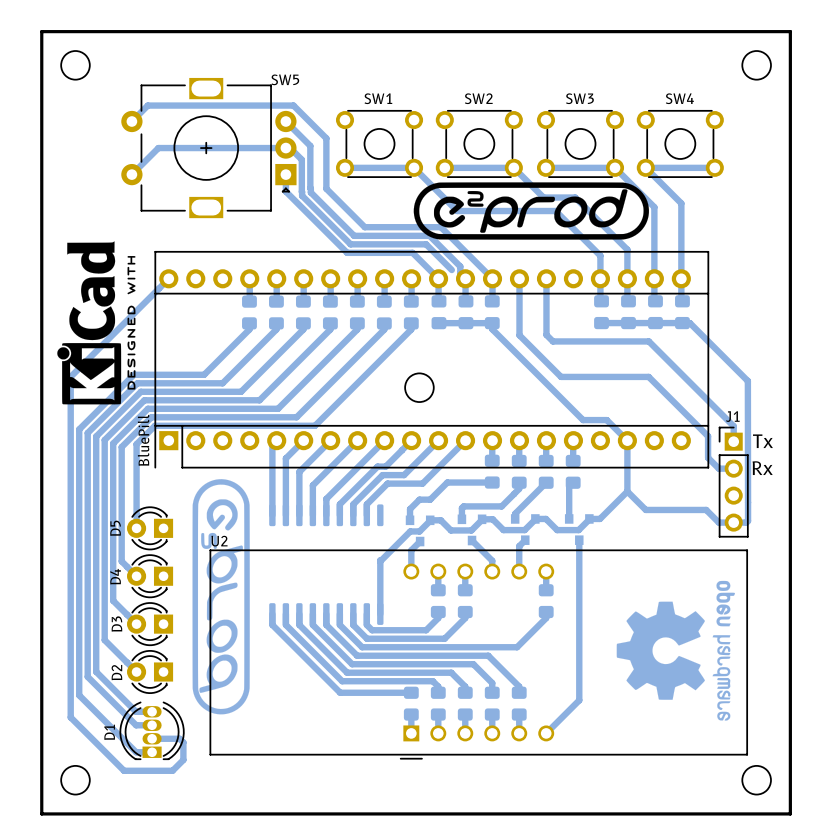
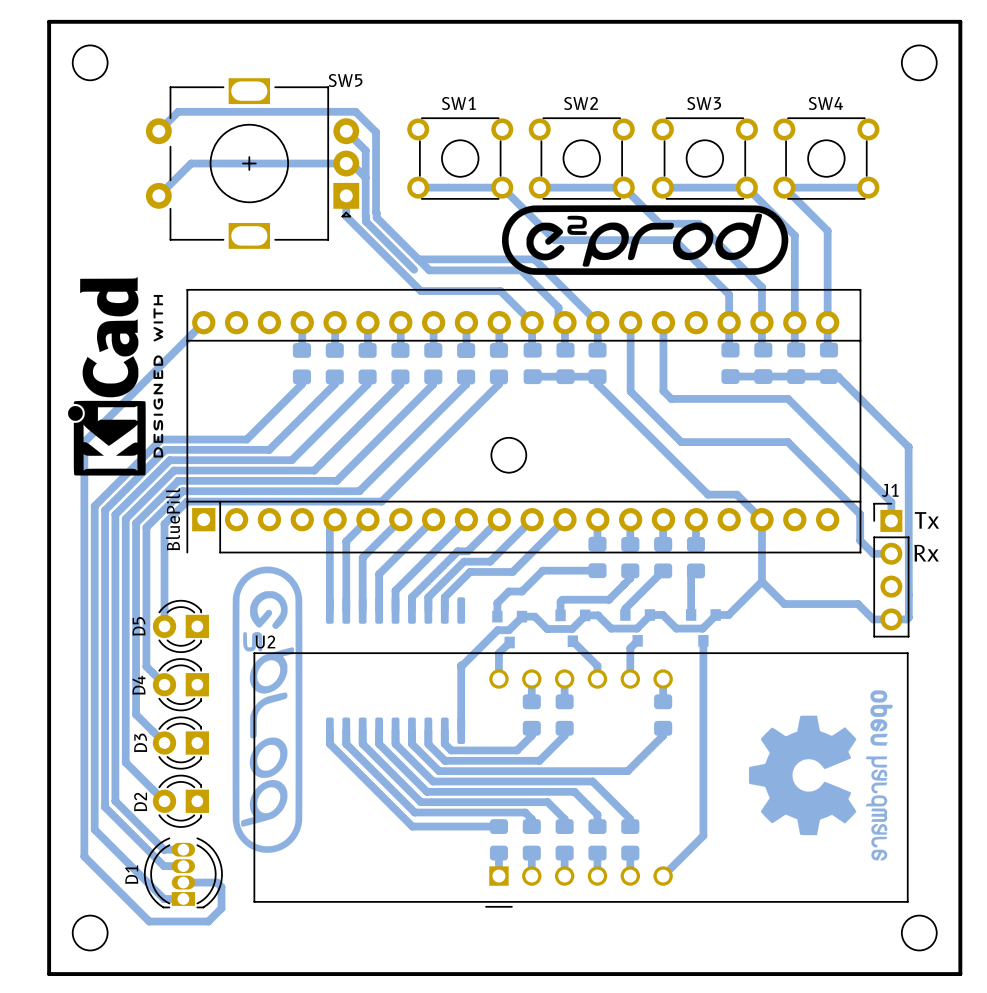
bottom track: (310, 122) (326, 138) (326, 188) (364, 227) (440, 227) -> (418, 259) (535, 259)
bottom track: none -> (376, 132) (376, 160)
bottom track: (301, 137) (310, 145) -> (365, 150) (365, 177)
bottom track: (341, 235) (350, 244) (426, 244) (451, 270) -> none

